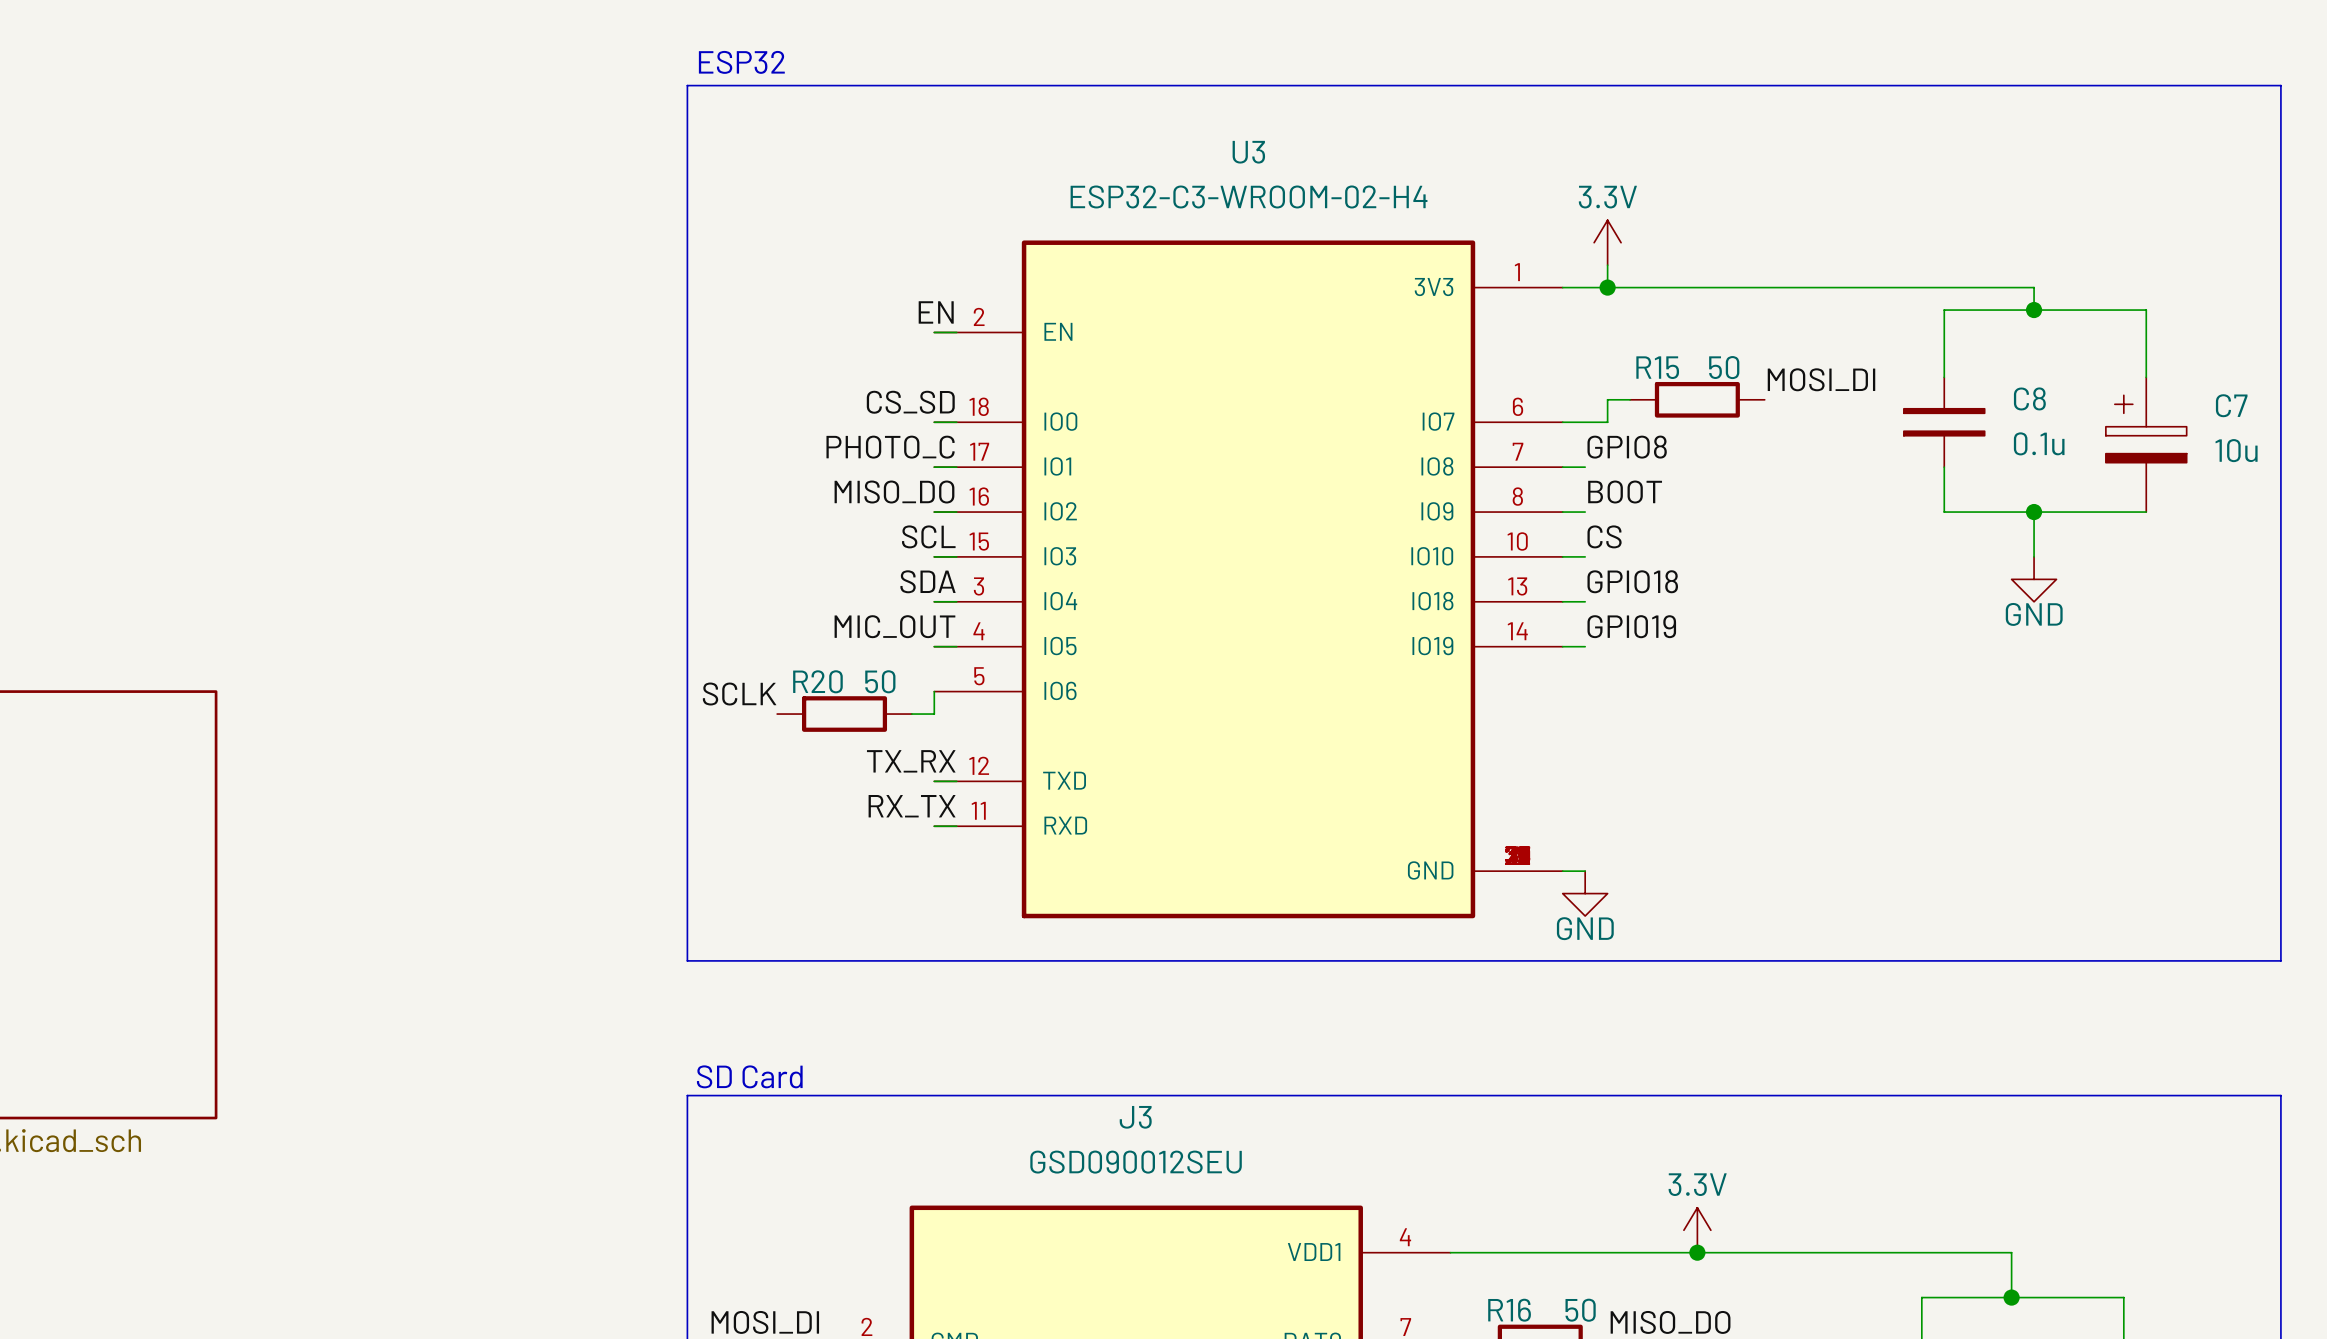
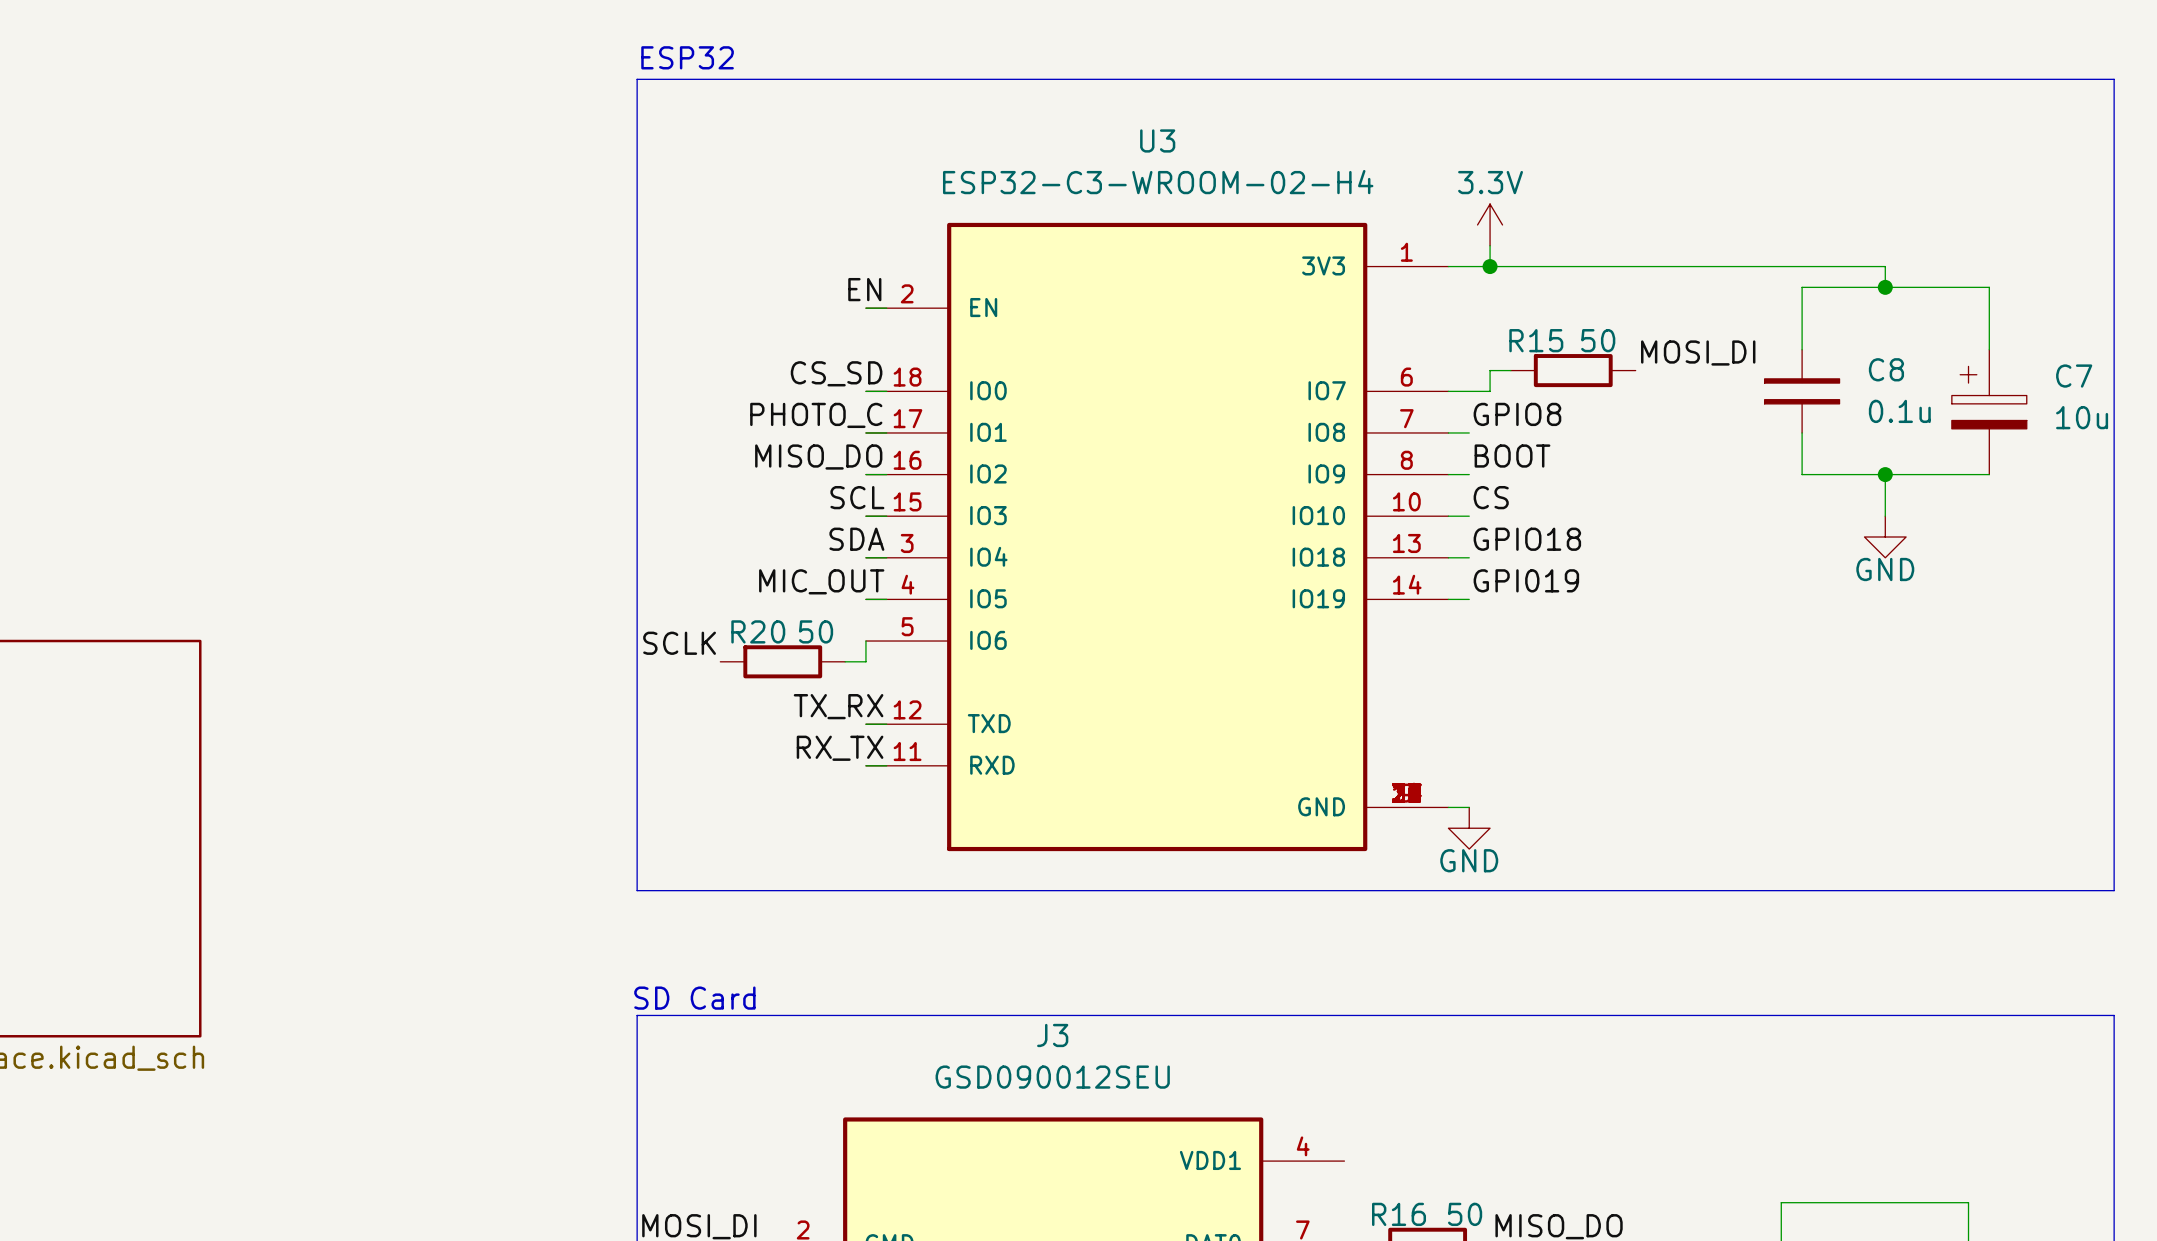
power symbol: 3.3V (1697, 1230) -> none
wire: (1450, 1252) (2011, 1252) (2011, 1297) -> none
junction: (1697, 1252) -> none
junction: (2011, 1297) -> none

